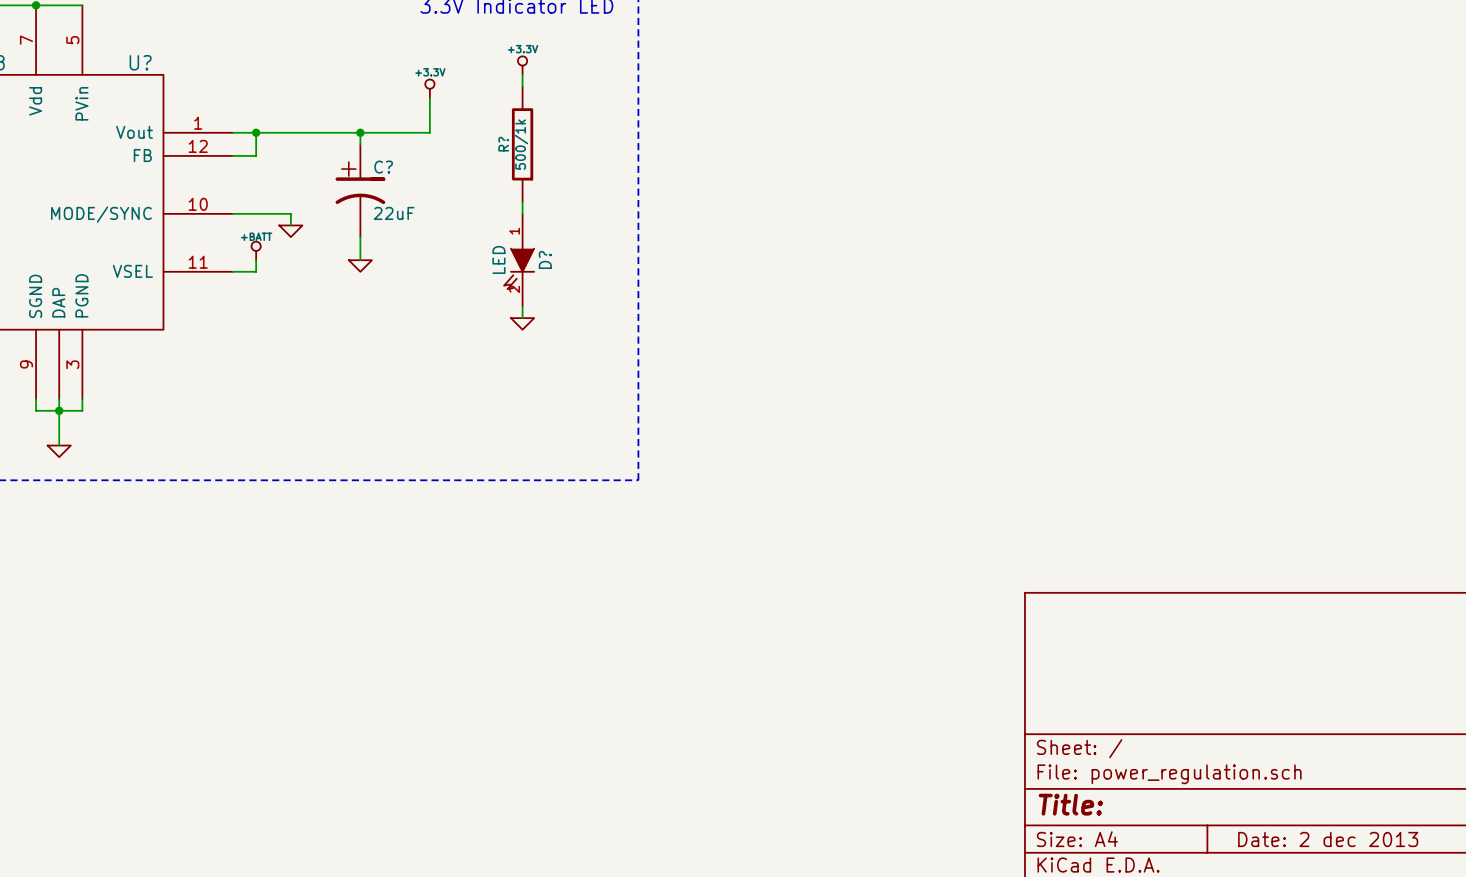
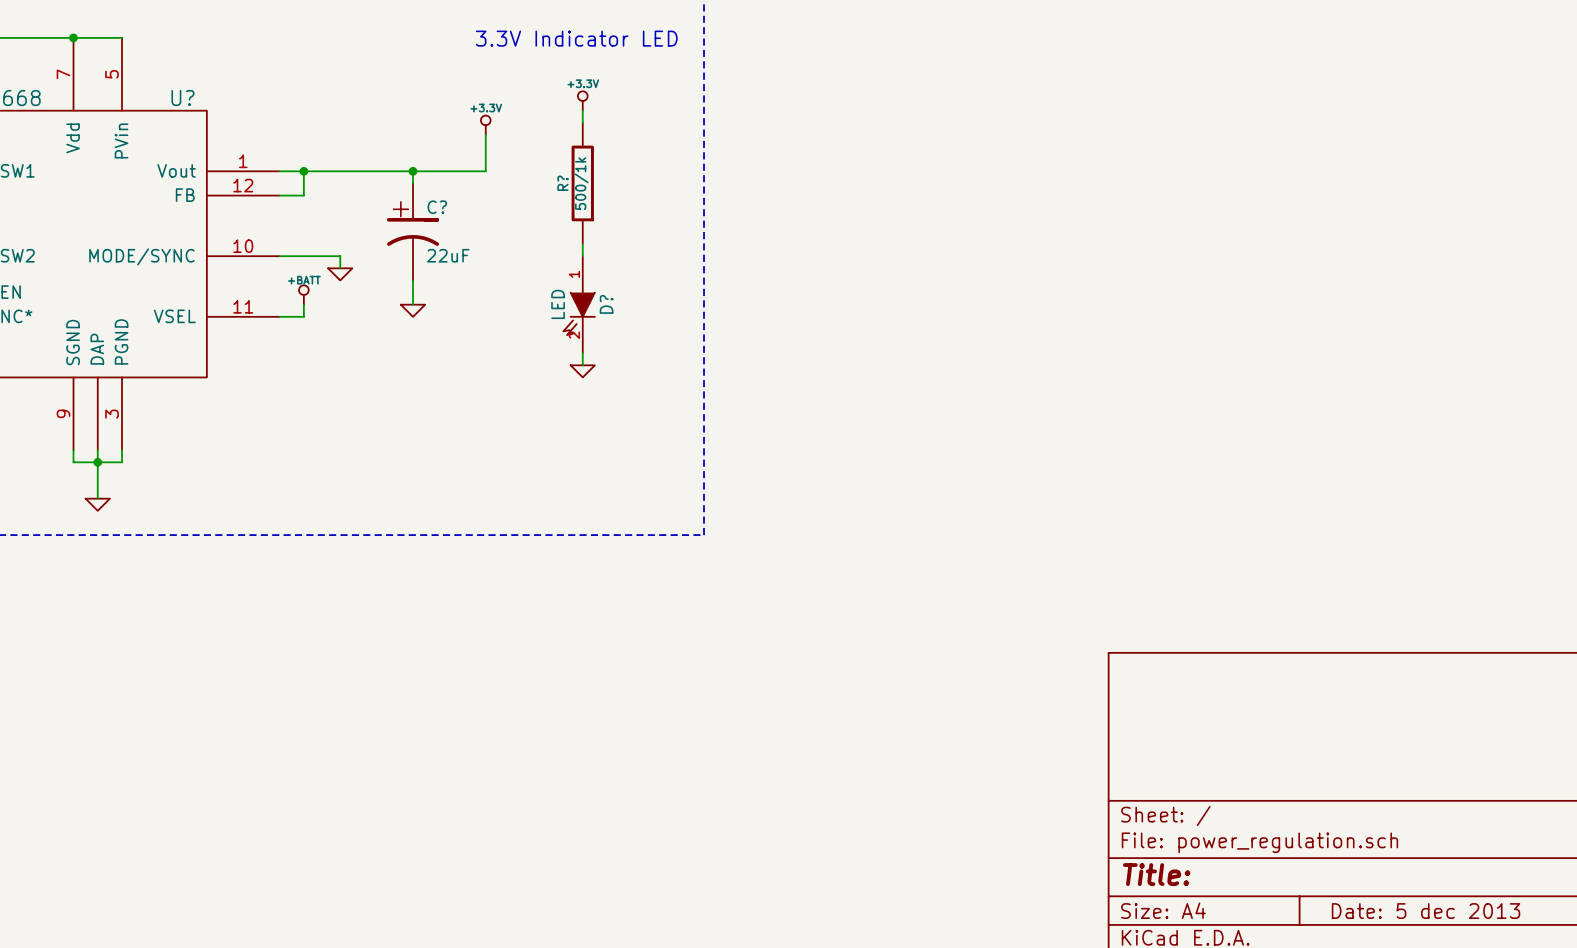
title block: Date: 2 dec 2013 (1328, 839) -> Date: 5 dec 2013 (1426, 911)

